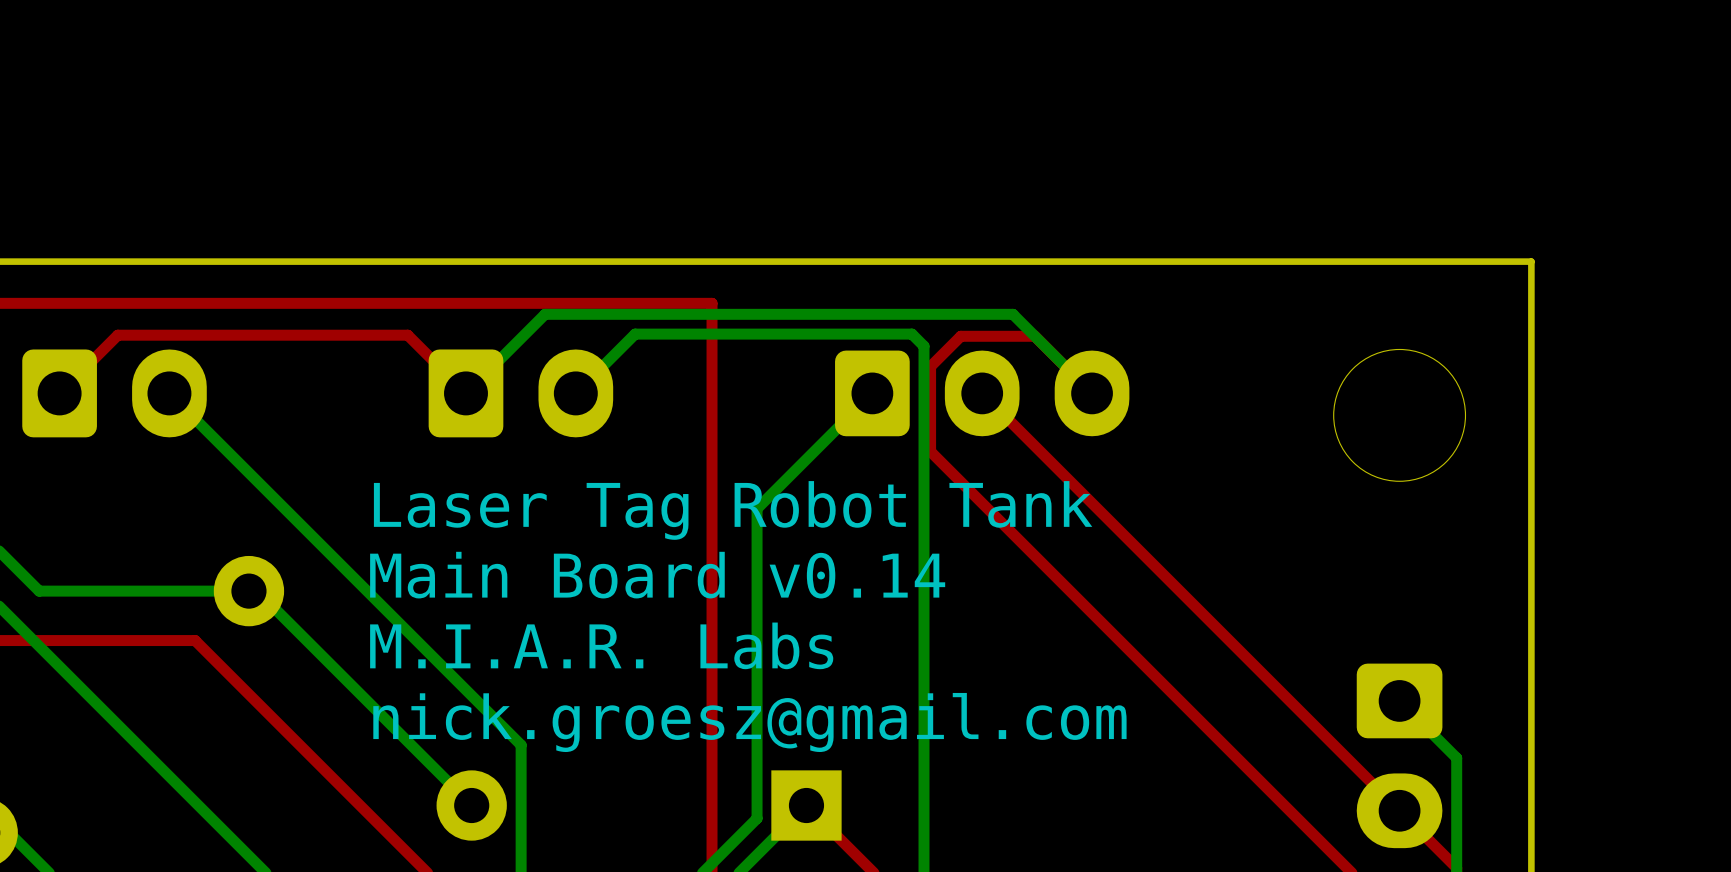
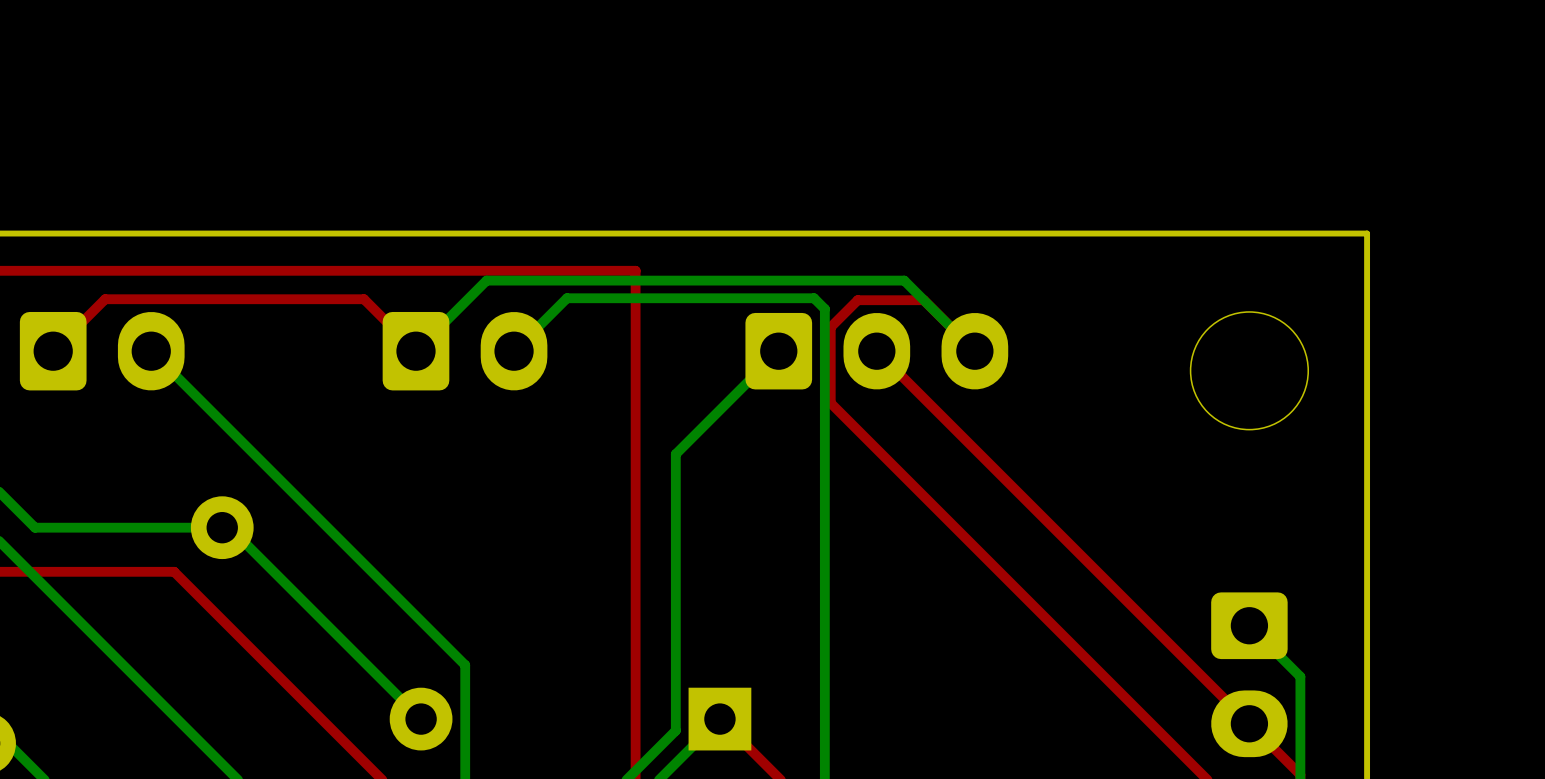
text: Laser Tag Robot Tank (733, 510) -> none
text: Main Board v0.14 (657, 575) -> none
text: M.I.A.R. Labs (601, 645) -> none
text: nick.groesz@gmail.com (749, 722) -> none

